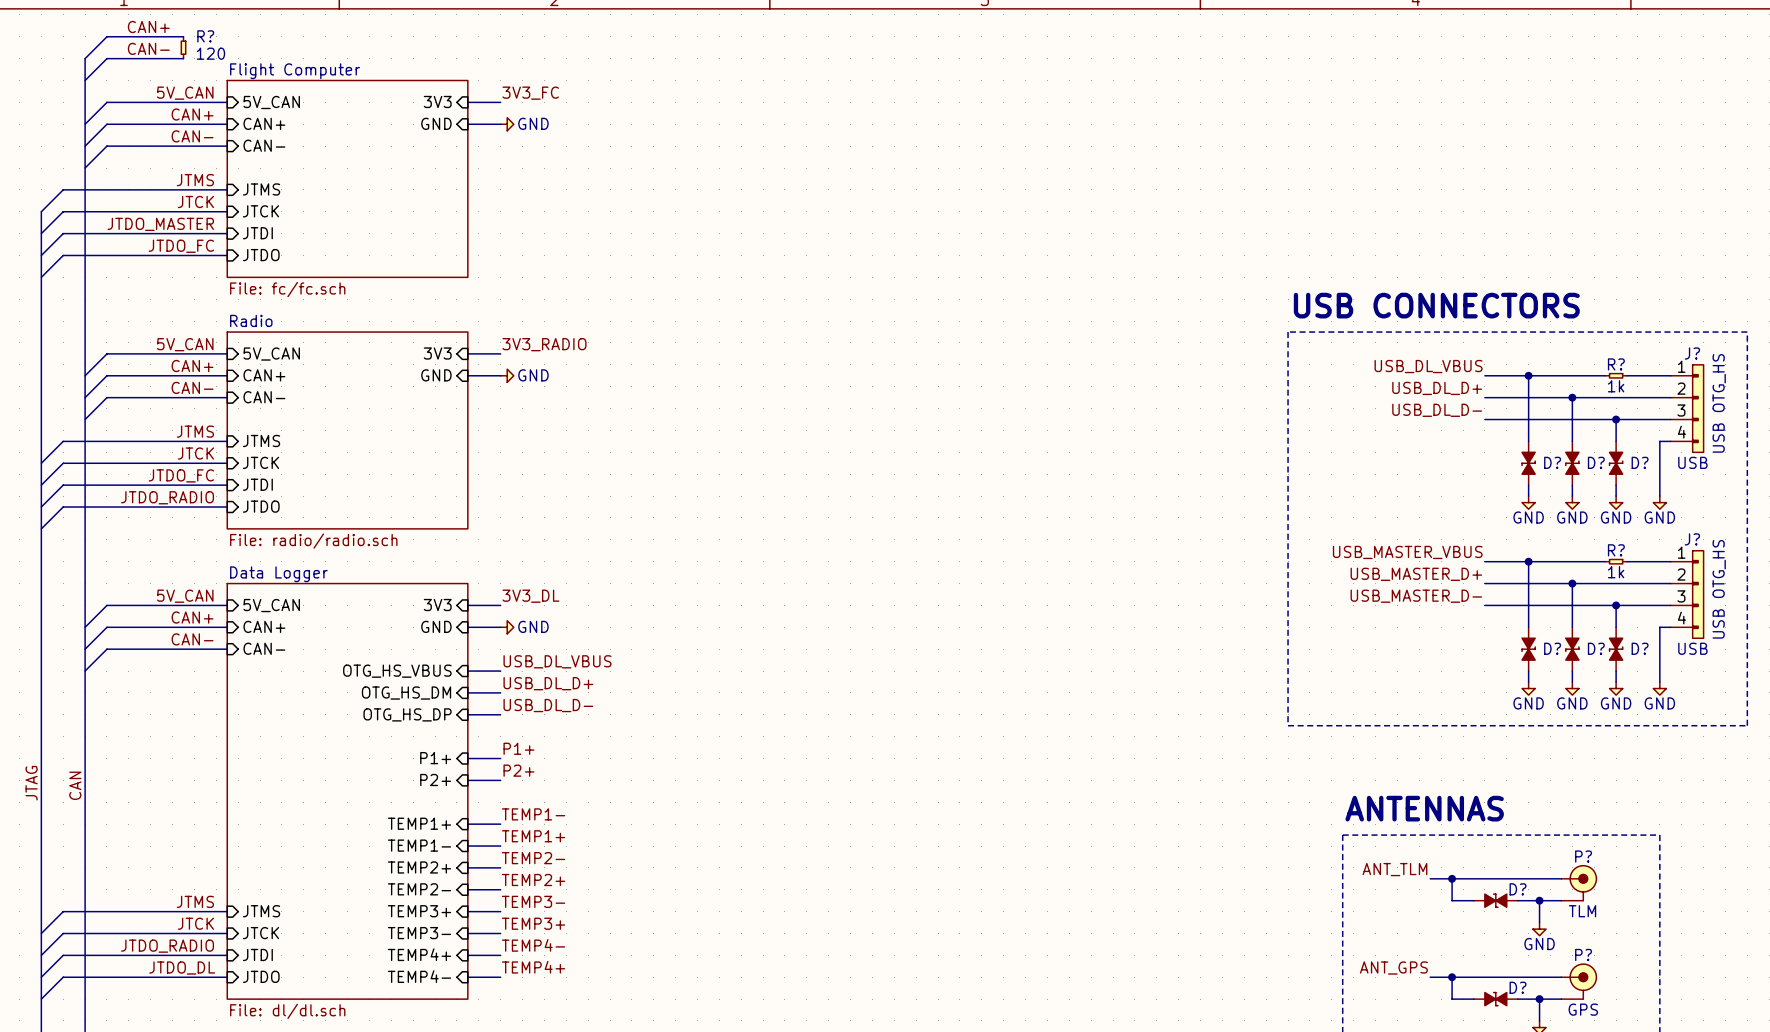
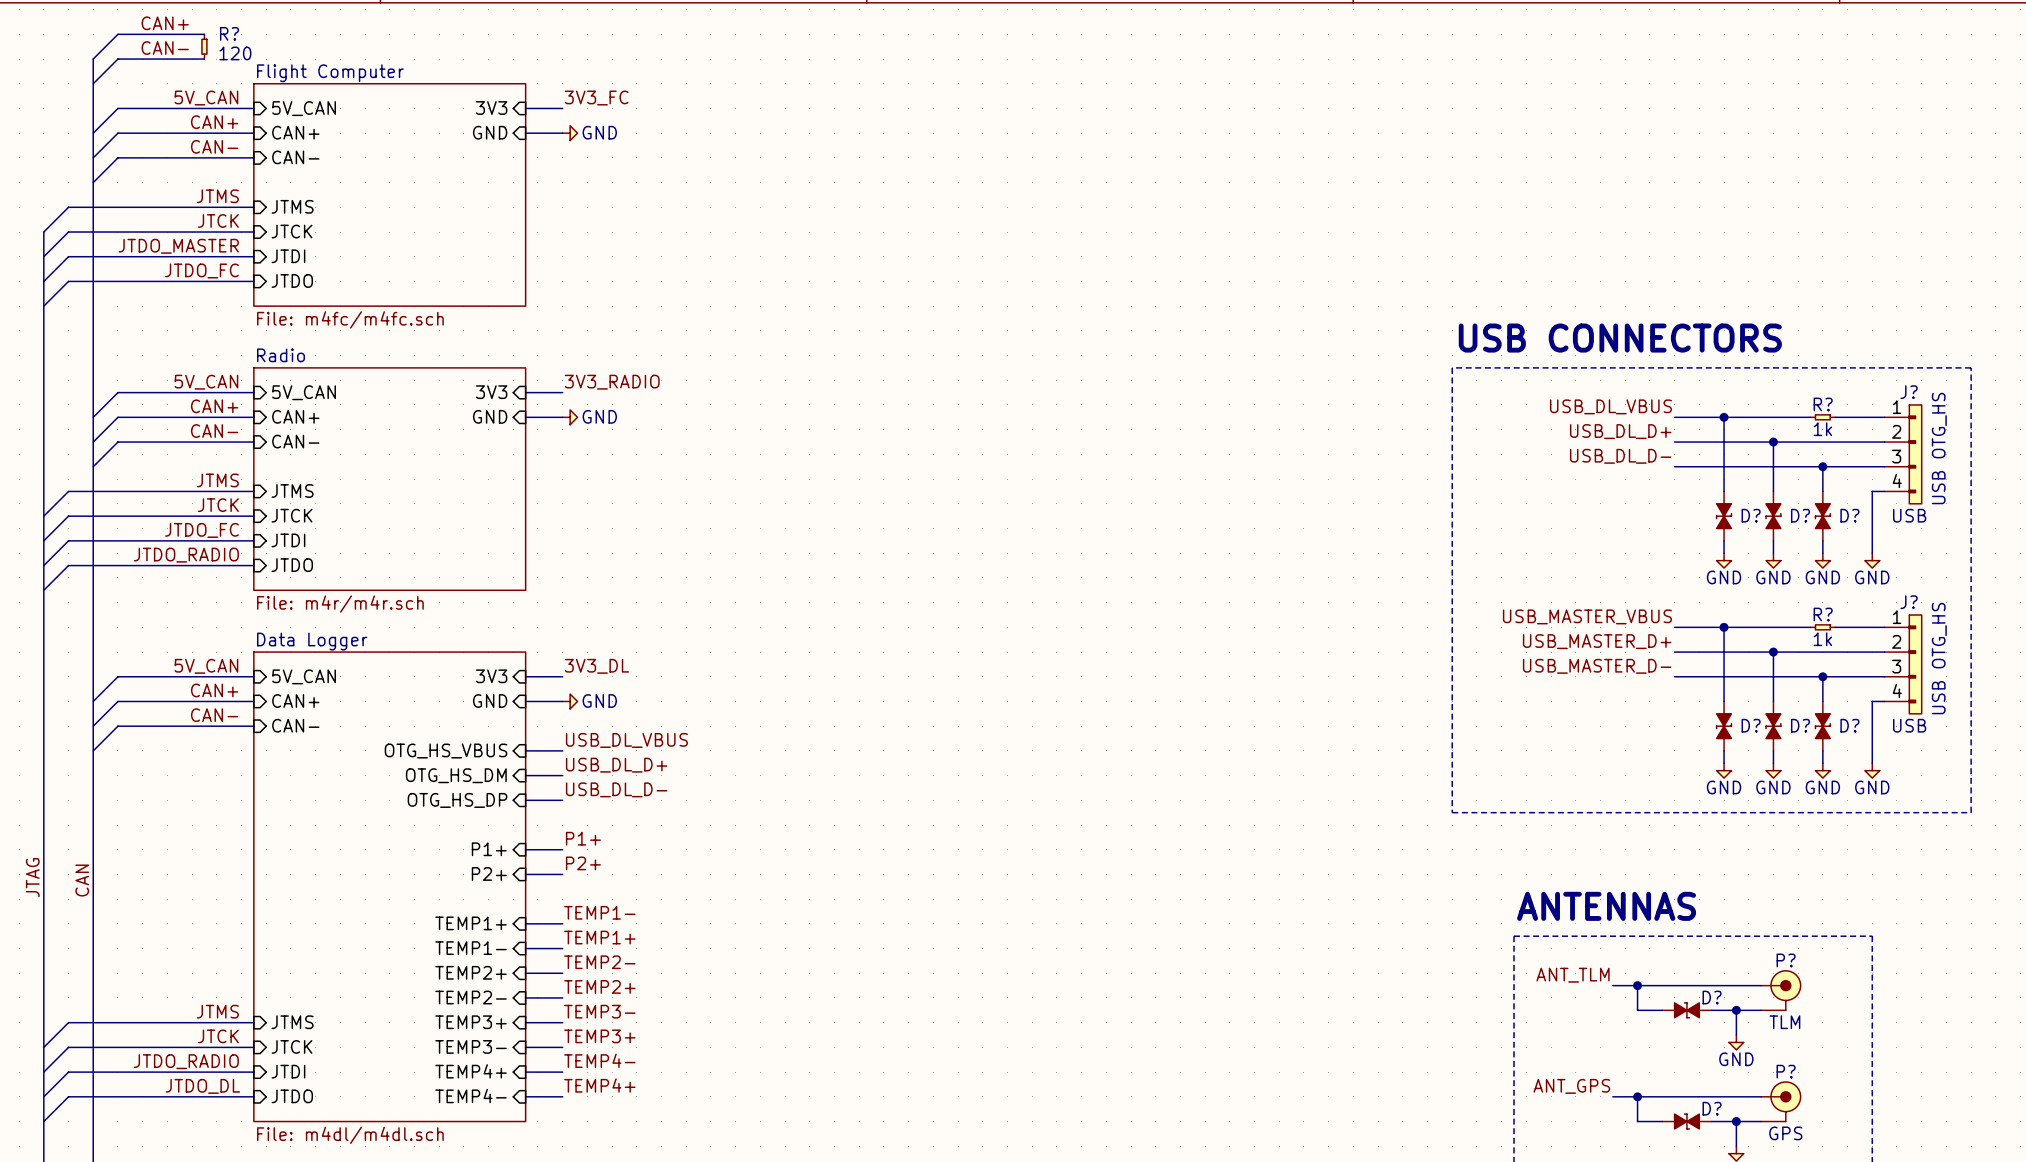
sheet Flight Computer value: File: fc/fc.sch (287, 289) -> File: m4fc/m4fc.sch (350, 319)
sheet Radio value: File: radio/radio.sch (313, 541) -> File: m4r/m4r.sch (340, 604)
sheet Data Logger value: File: dl/dl.sch (287, 1011) -> File: m4dl/m4dl.sch (350, 1135)

